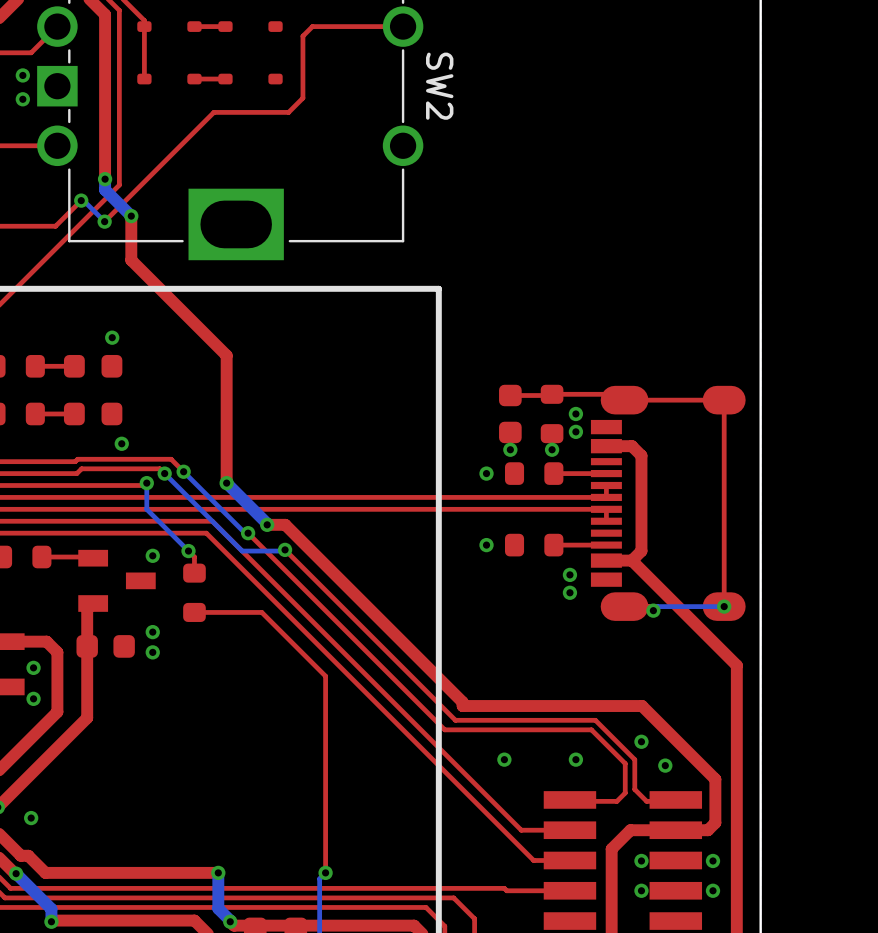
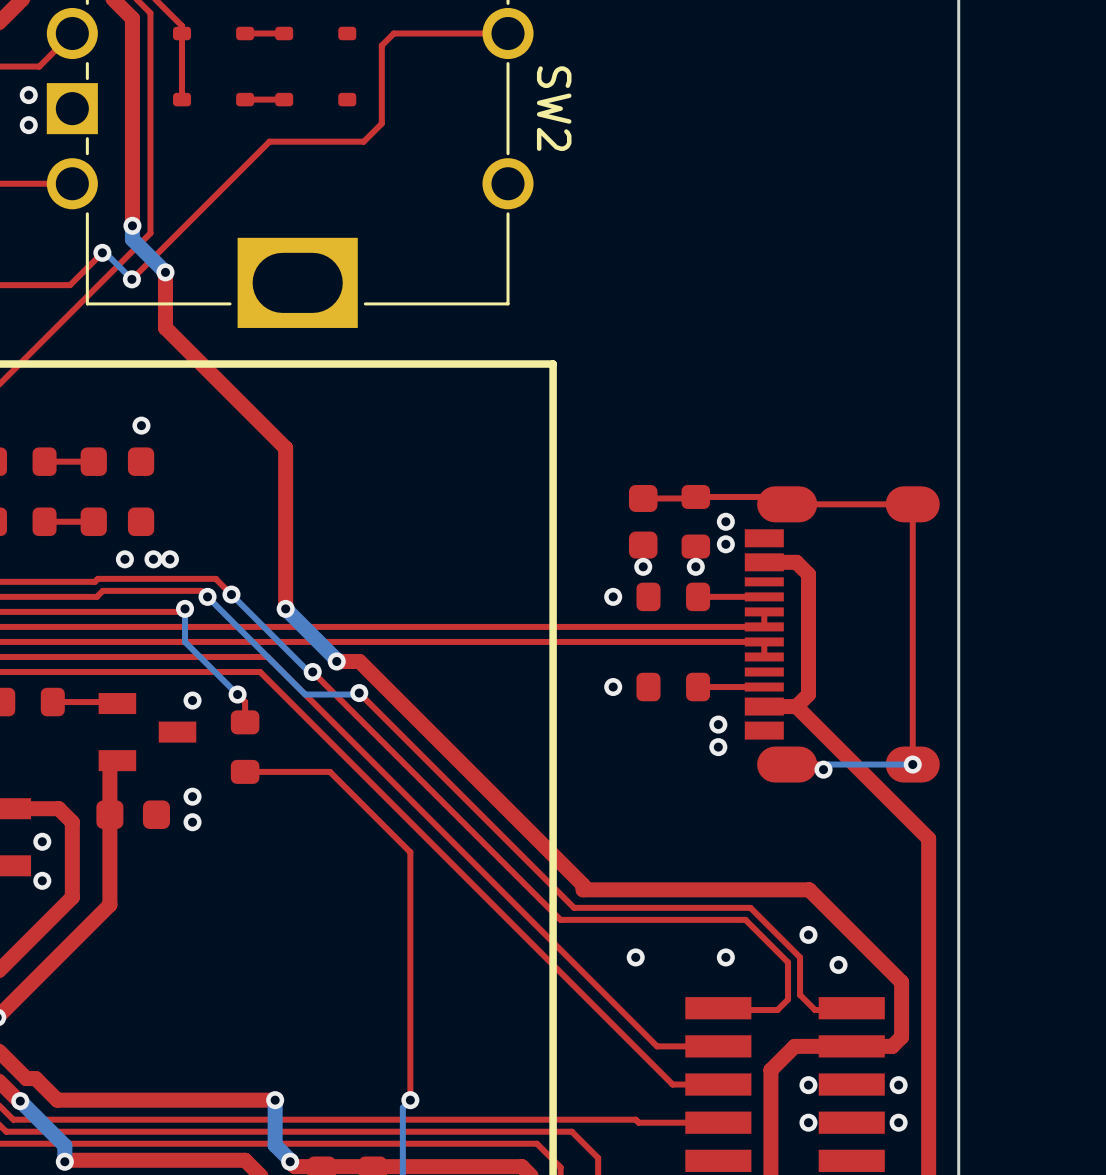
via: none -> (124, 559)
via: none -> (169, 559)
via: (31, 818) -> none

